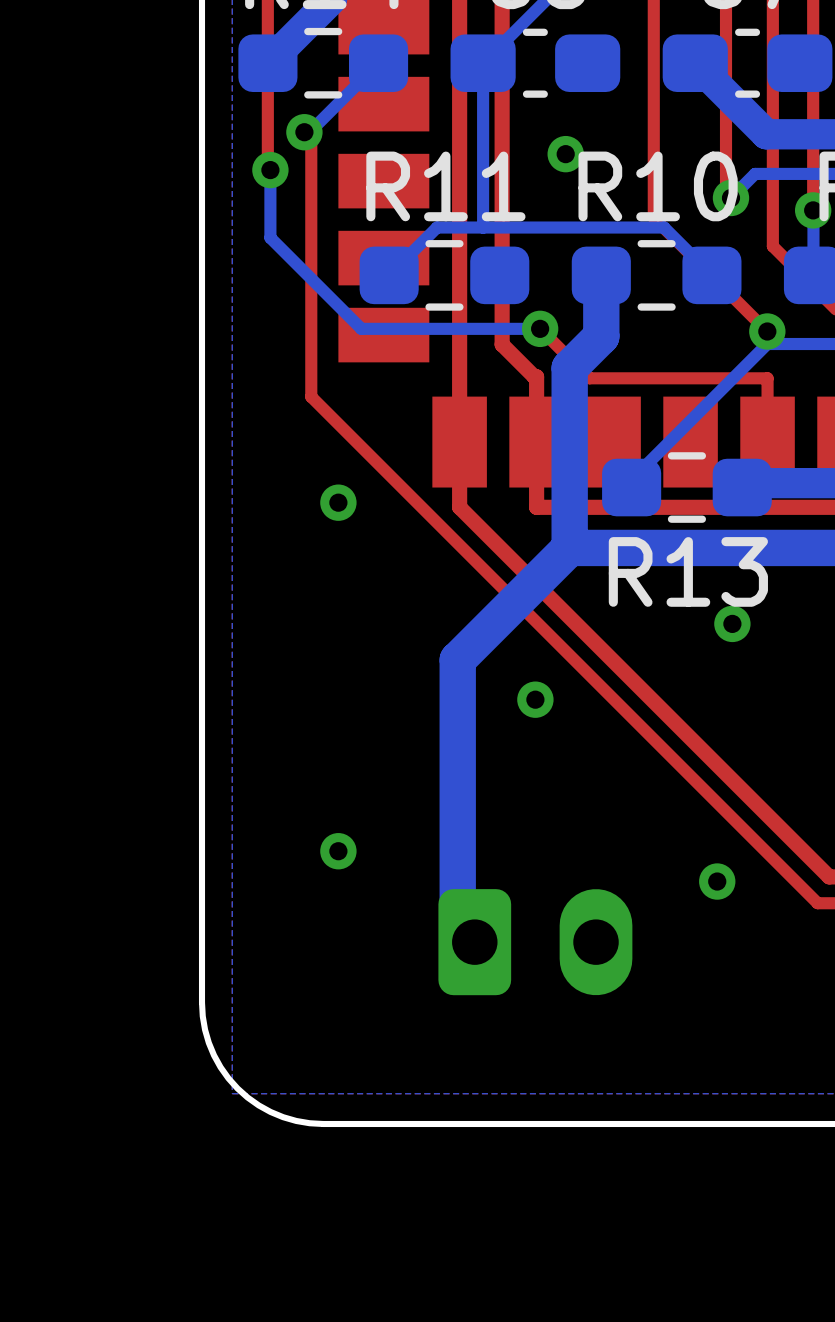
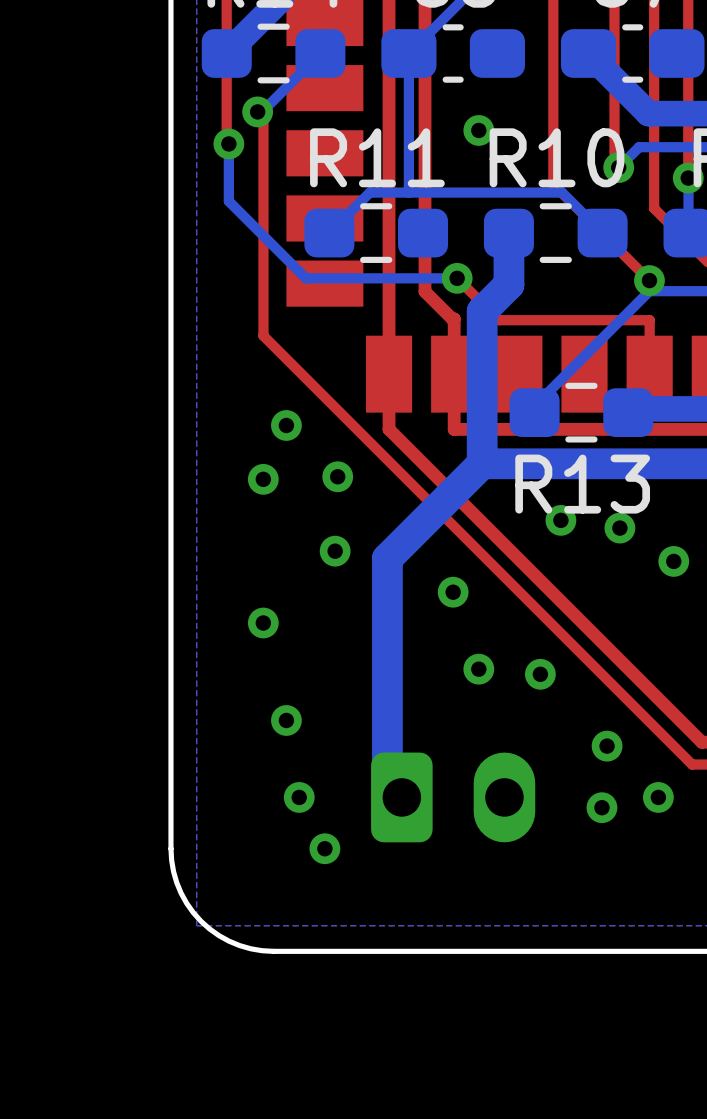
via: none -> (337, 476)
via: none -> (263, 479)
via: none -> (560, 520)
via: none -> (335, 551)
via: none -> (673, 561)
via: none -> (263, 623)
via: none -> (478, 669)
via: none -> (540, 674)
via: none -> (299, 797)
via: none -> (658, 797)
via: none -> (601, 807)
via: none -> (324, 848)

